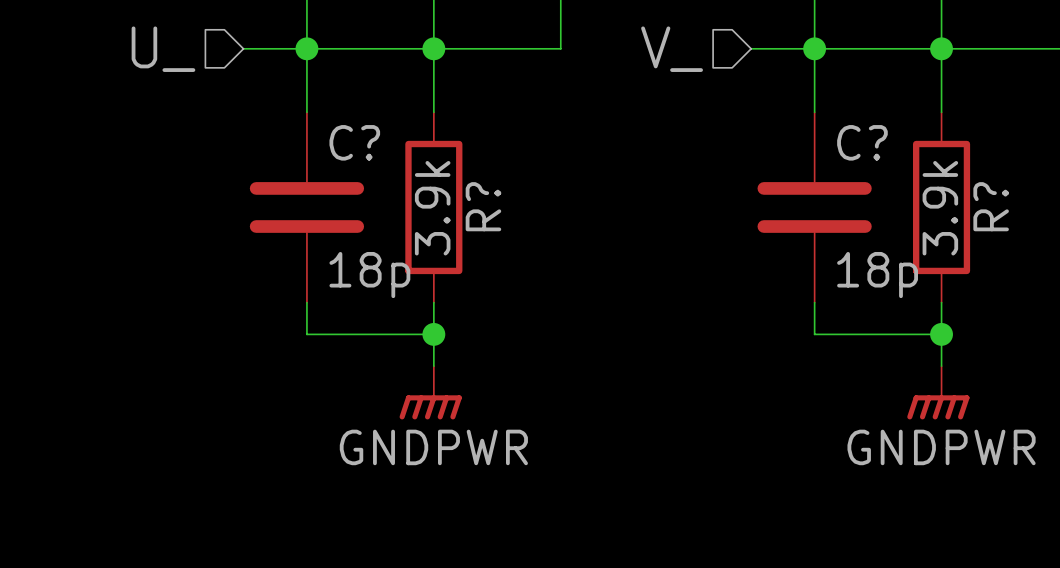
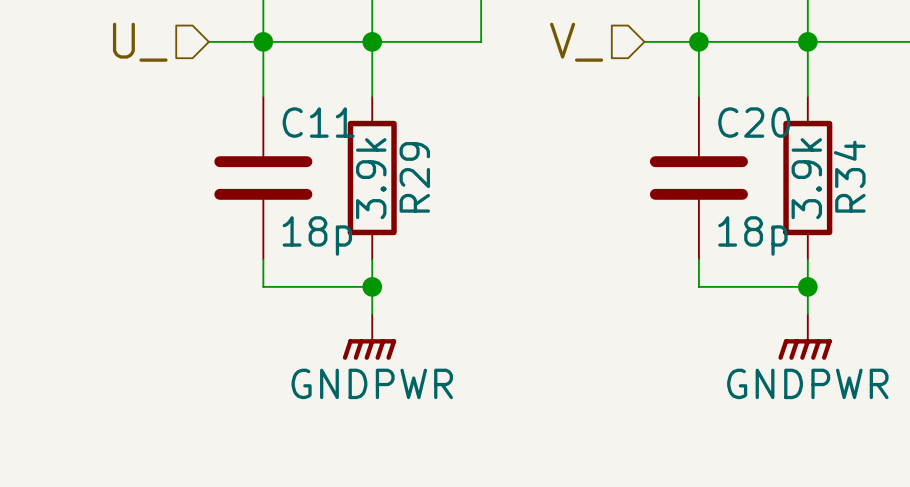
C? name: C? (354, 142) -> C11 (318, 122)
C? name: C? (862, 142) -> C20 (754, 122)
R? name: R? (483, 206) -> R29 (414, 177)
R? name: R? (991, 206) -> R34 (849, 176)

